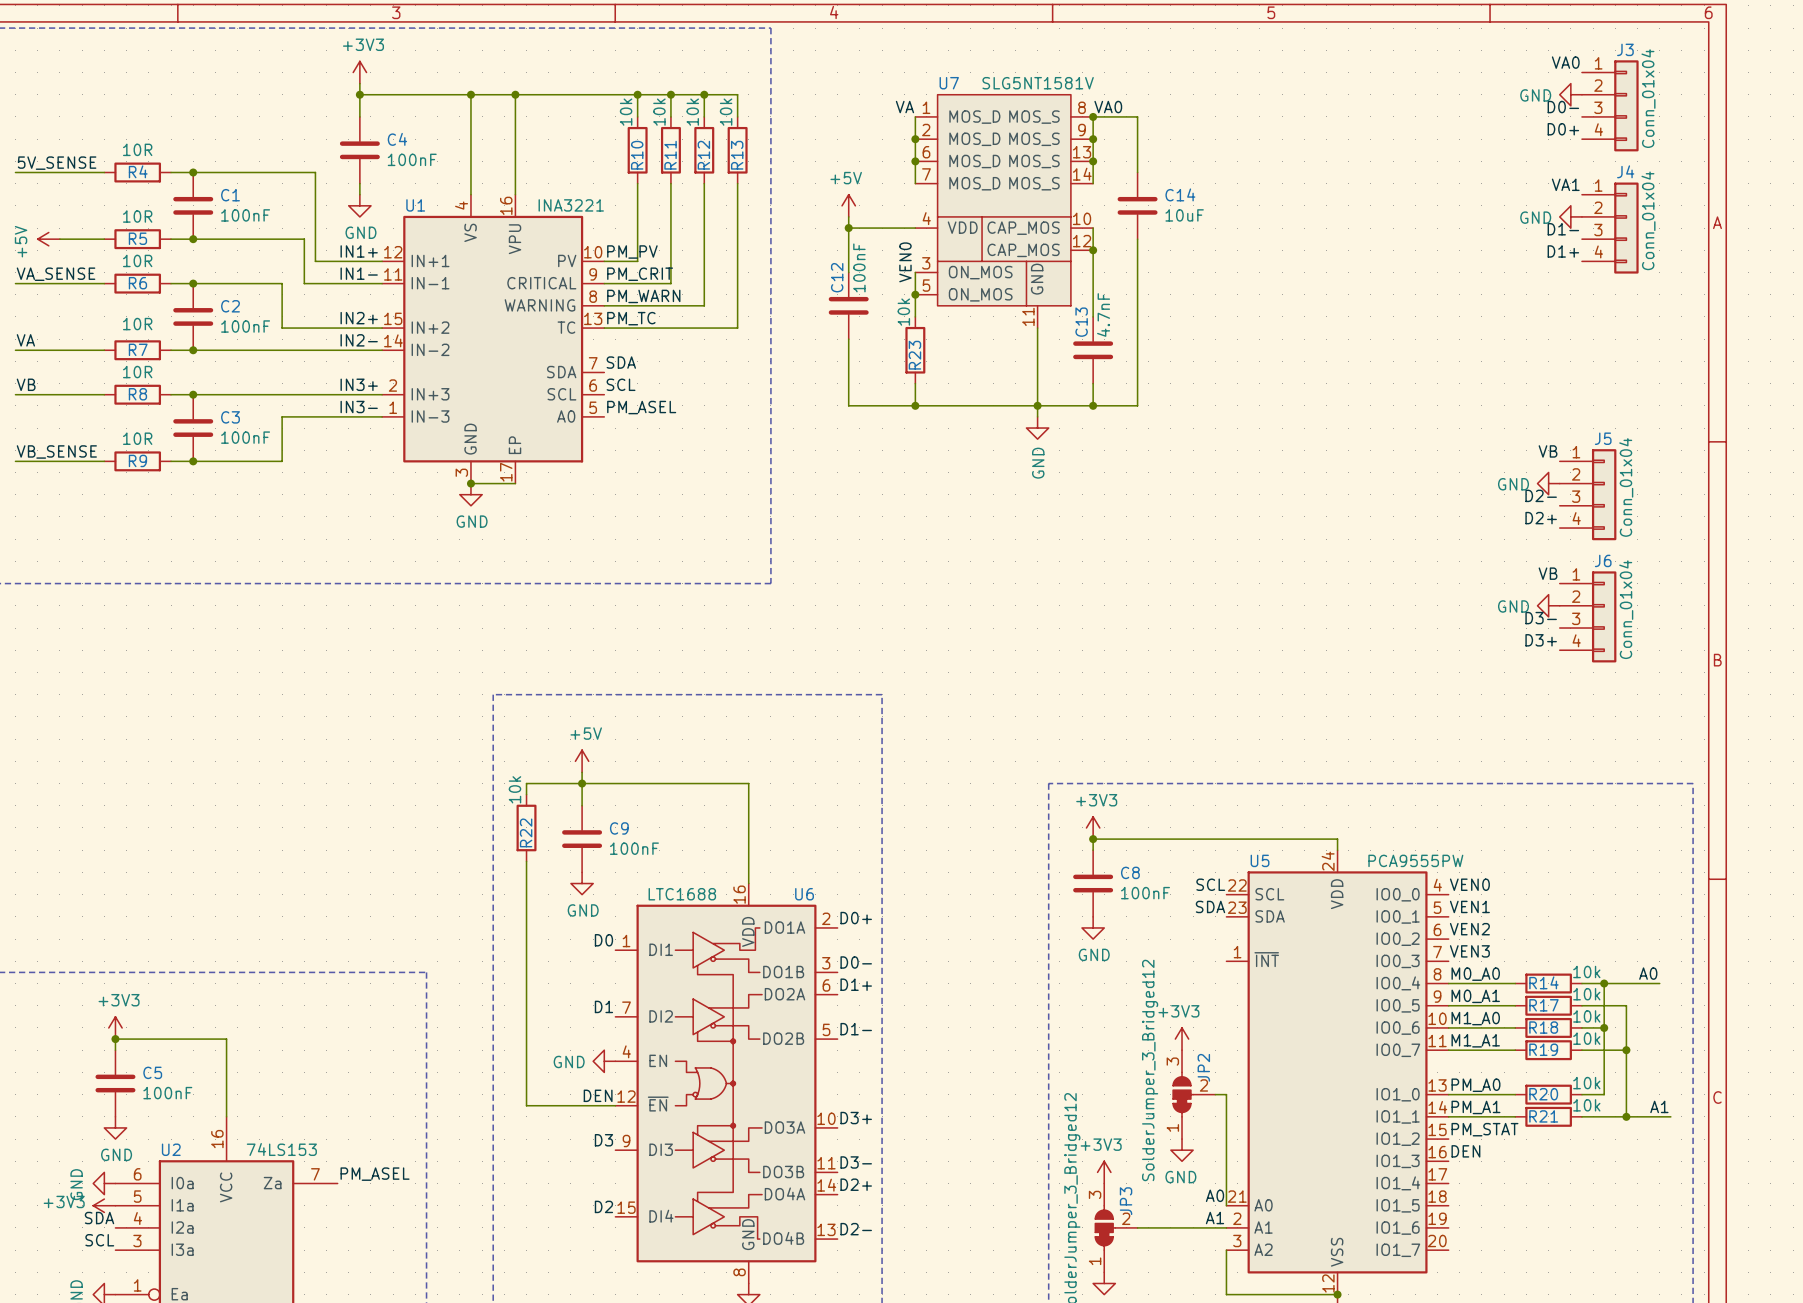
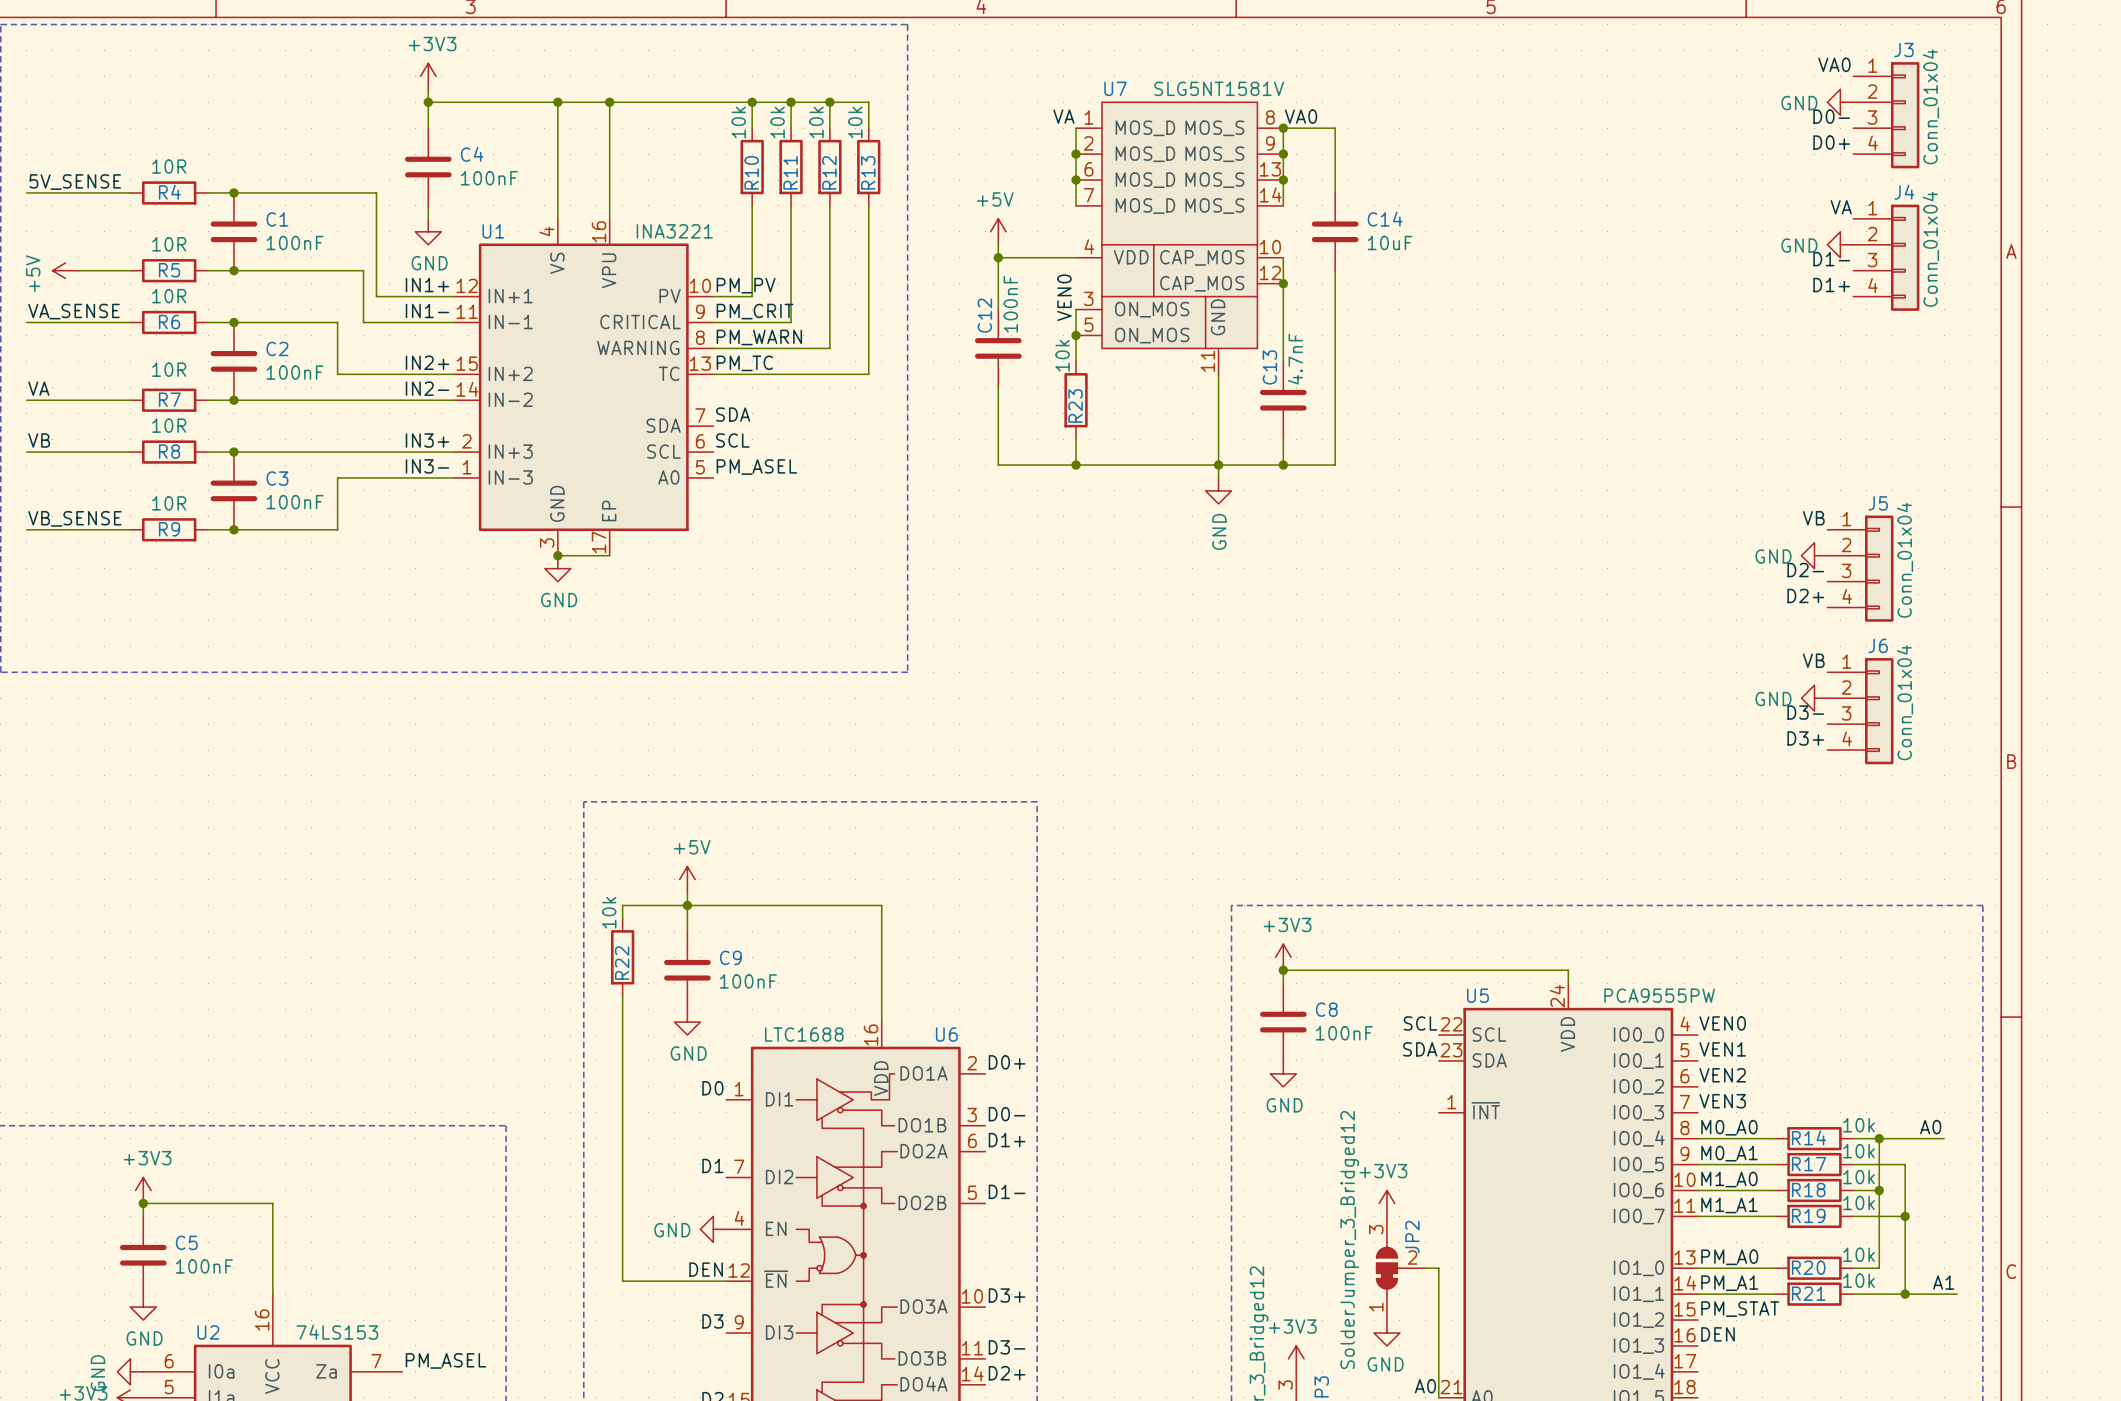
label: VA1 (1565, 184) -> VA (1841, 207)

